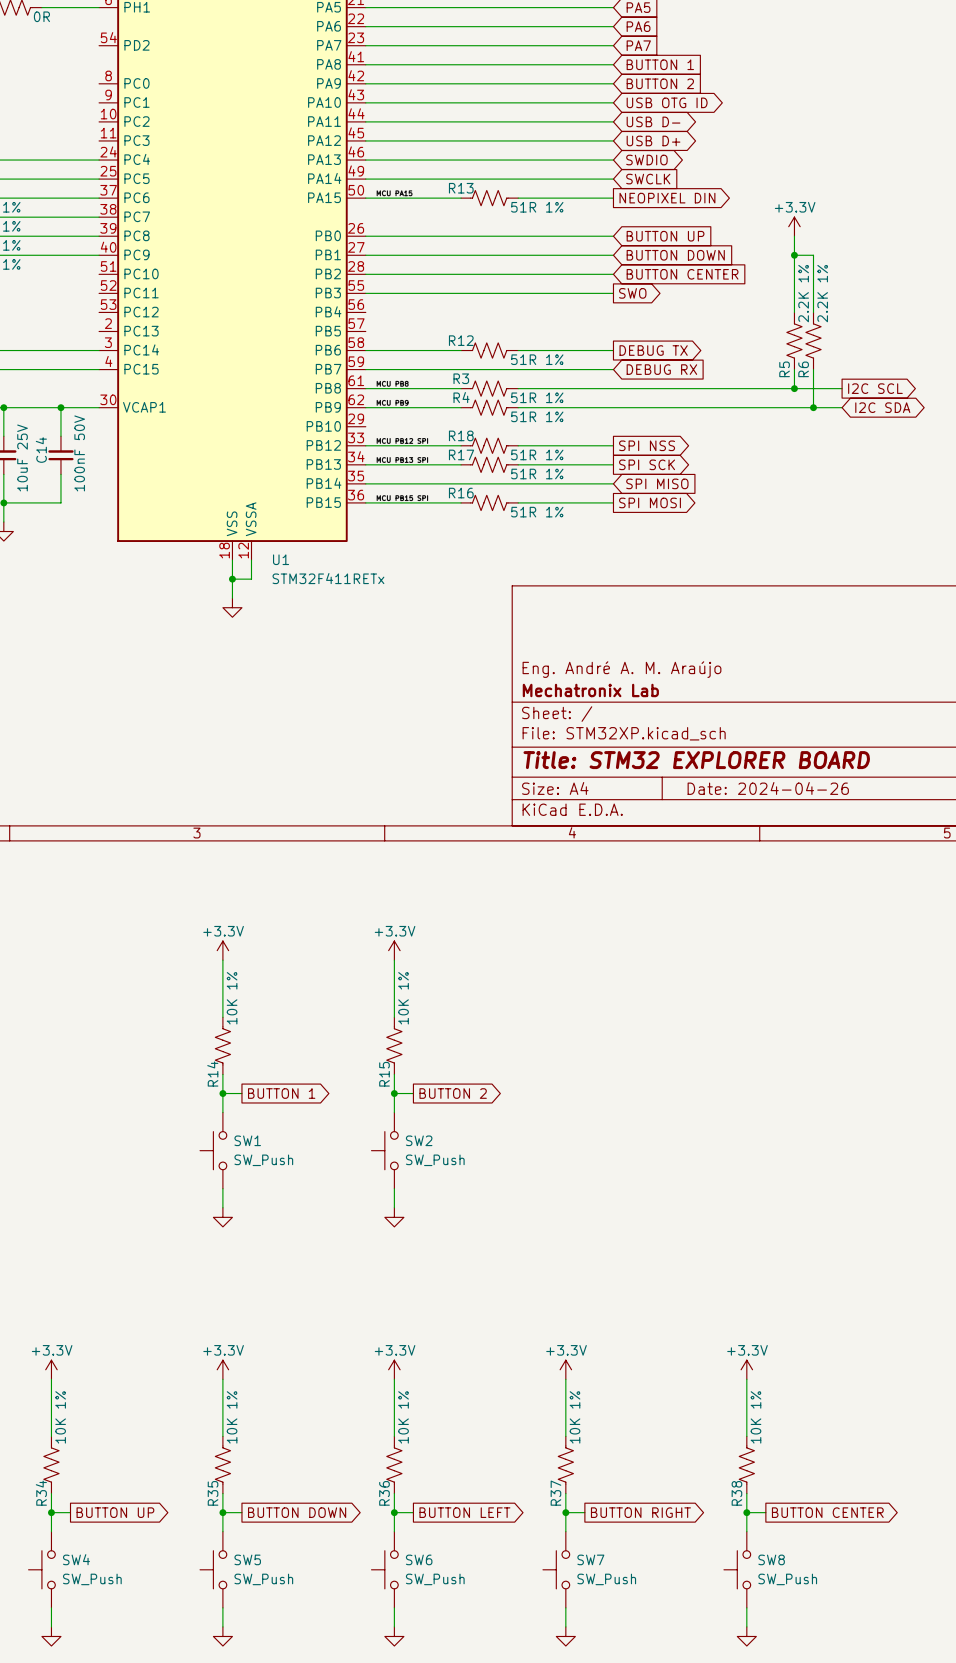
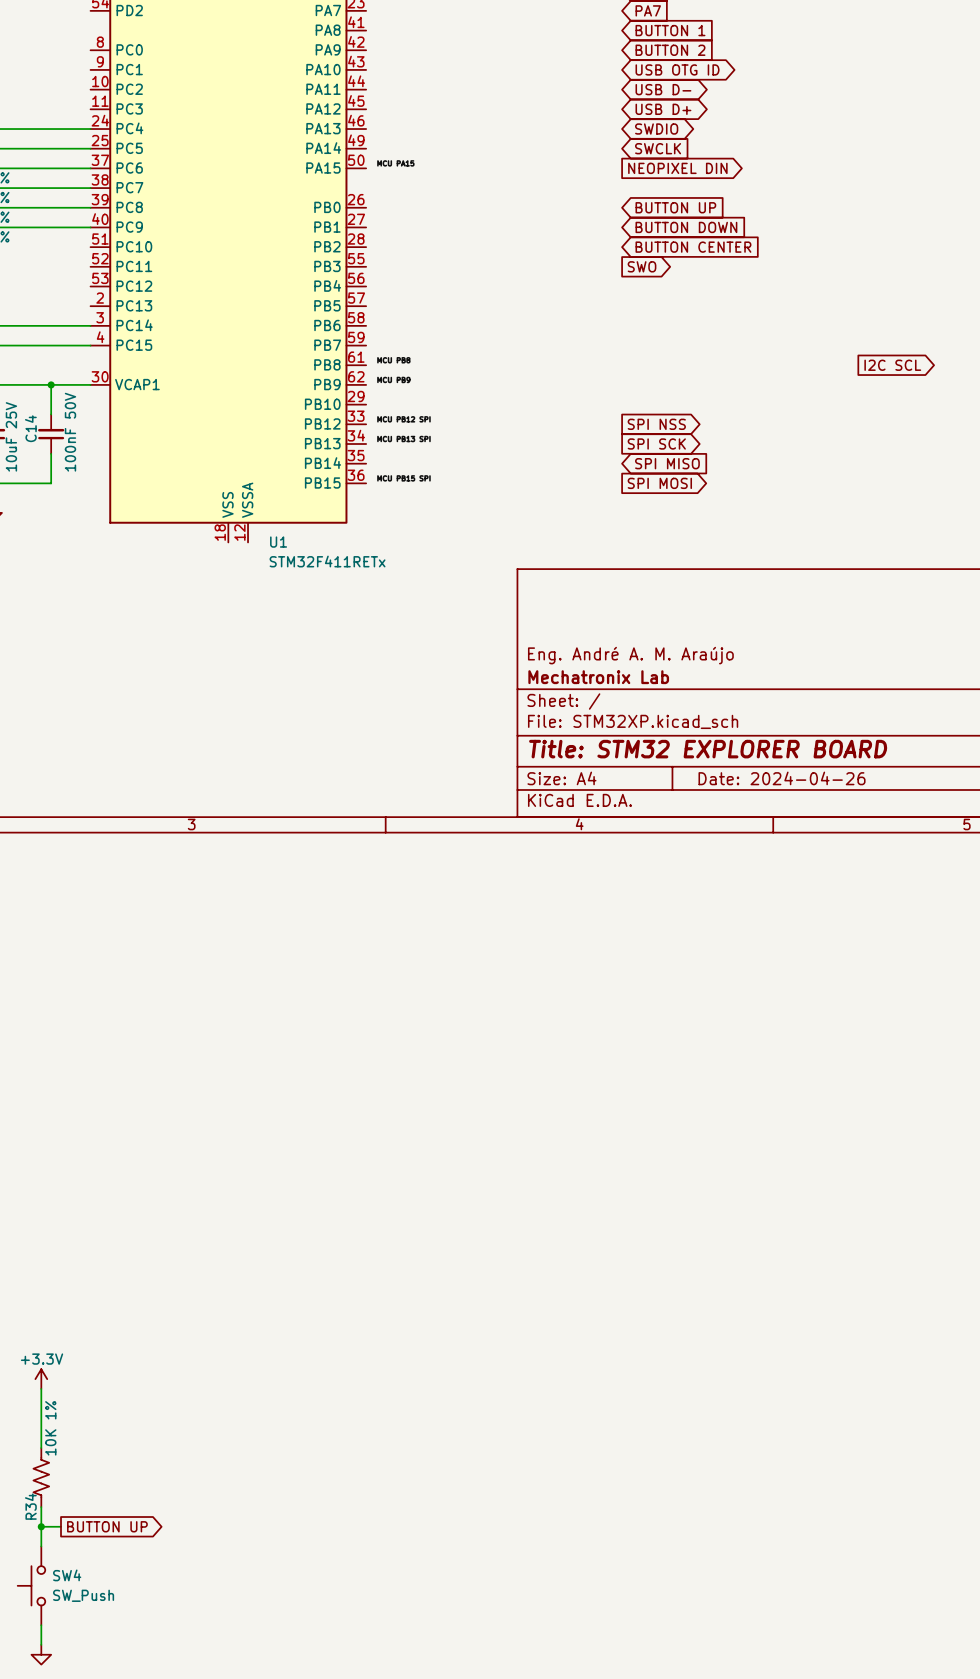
wire: (365, 45) (613, 45) -> none
wire: (365, 64) (613, 64) -> none
wire: (365, 83) (613, 83) -> none
wire: (365, 102) (613, 102) -> none
wire: (365, 121) (613, 121) -> none
wire: (365, 140) (613, 140) -> none
wire: (365, 160) (613, 160) -> none
wire: (365, 179) (613, 179) -> none
wire: (365, 198) (461, 198) -> none
R13: 51R 1% (489, 198) -> none
wire: (518, 198) (613, 198) -> none
power symbol: +3.3V (794, 226) -> none
wire: (365, 236) (613, 236) -> none
wire: (794, 236) (794, 312) -> none
wire: (365, 255) (613, 255) -> none
wire: (794, 255) (813, 255) (813, 312) -> none
junction: (794, 255) -> none
wire: (365, 274) (613, 274) -> none
wire: (365, 293) (613, 293) -> none
R5: 2.2K 1% (794, 341) -> none
R6: 2.2K 1% (813, 341) -> none
wire: (365, 350) (461, 350) -> none
R12: 51R 1% (489, 350) -> none
wire: (518, 350) (613, 350) -> none
global label: DEBUG TX (653, 350) -> none
wire: (365, 369) (613, 369) -> none
global label: DEBUG RX (661, 369) -> none
wire: (794, 369) (794, 388) -> none
wire: (813, 369) (813, 407) -> none
wire: (365, 388) (461, 388) -> none
R3: 51R 1% (489, 388) -> none
wire: (518, 388) (842, 388) -> none
junction: (794, 388) -> none
wire: (365, 407) (461, 407) -> none
R4: 51R 1% (489, 407) -> none
wire: (518, 407) (842, 407) -> none
junction: (813, 407) -> none
global label: I2C SDA (882, 407) -> none
wire: (365, 445) (461, 445) -> none
R18: 51R 1% (489, 445) -> none
wire: (518, 445) (613, 445) -> none
wire: (365, 464) (461, 464) -> none
R17: 51R 1% (489, 464) -> none
wire: (518, 464) (613, 464) -> none
wire: (365, 483) (613, 483) -> none
wire: (365, 502) (461, 502) -> none
R16: 51R 1% (489, 502) -> none
wire: (518, 502) (613, 502) -> none
wire: (232, 560) (232, 598) -> none
wire: (251, 560) (251, 579) (232, 579) -> none
junction: (232, 579) -> none
power symbol: (232, 607) -> none
power symbol: +3.3V (222, 950) -> none
power symbol: +3.3V (394, 950) -> none
wire: (222, 960) (222, 1017) -> none
wire: (394, 960) (394, 1017) -> none
R14: 10K 1% (222, 1045) -> none
R15: 10K 1% (394, 1045) -> none
wire: (222, 1074) (222, 1112) -> none
wire: (394, 1074) (394, 1112) -> none
wire: (222, 1093) (241, 1093) -> none
junction: (222, 1093) -> none
global label: BUTTON 1 (281, 1093) -> none
wire: (394, 1093) (413, 1093) -> none
junction: (394, 1093) -> none
global label: BUTTON 2 (453, 1093) -> none
SW1: SW_Push (213, 1150) -> none
SW2: SW_Push (384, 1150) -> none
wire: (222, 1188) (222, 1207) -> none
wire: (394, 1188) (394, 1207) -> none
power symbol: (222, 1217) -> none
power symbol: (394, 1217) -> none
power symbol: +3.3V (222, 1369) -> none
power symbol: +3.3V (394, 1369) -> none
power symbol: +3.3V (565, 1369) -> none
power symbol: +3.3V (746, 1369) -> none
wire: (222, 1379) (222, 1436) -> none
wire: (394, 1379) (394, 1436) -> none
wire: (565, 1379) (565, 1436) -> none
wire: (746, 1379) (746, 1436) -> none
R35: 10K 1% (222, 1465) -> none
R36: 10K 1% (394, 1465) -> none
R37: 10K 1% (565, 1465) -> none
R38: 10K 1% (746, 1465) -> none
wire: (222, 1493) (222, 1531) -> none
wire: (394, 1493) (394, 1531) -> none
wire: (565, 1493) (565, 1531) -> none
wire: (746, 1493) (746, 1531) -> none
wire: (222, 1512) (241, 1512) -> none
junction: (222, 1512) -> none
global label: BUTTON DOWN (297, 1512) -> none
wire: (394, 1512) (413, 1512) -> none
junction: (394, 1512) -> none
global label: BUTTON LEFT (464, 1512) -> none
wire: (565, 1512) (584, 1512) -> none
junction: (565, 1512) -> none
global label: BUTTON RIGHT (640, 1512) -> none
wire: (746, 1512) (765, 1512) -> none
junction: (746, 1512) -> none
global label: BUTTON CENTER (827, 1512) -> none
SW5: SW_Push (213, 1569) -> none
SW6: SW_Push (384, 1569) -> none
SW7: SW_Push (556, 1569) -> none
SW8: SW_Push (737, 1569) -> none
wire: (222, 1607) (222, 1626) -> none
wire: (394, 1607) (394, 1626) -> none
wire: (565, 1607) (565, 1626) -> none
wire: (746, 1607) (746, 1626) -> none
power symbol: (222, 1636) -> none
power symbol: (394, 1636) -> none
power symbol: (565, 1636) -> none
power symbol: (746, 1636) -> none

